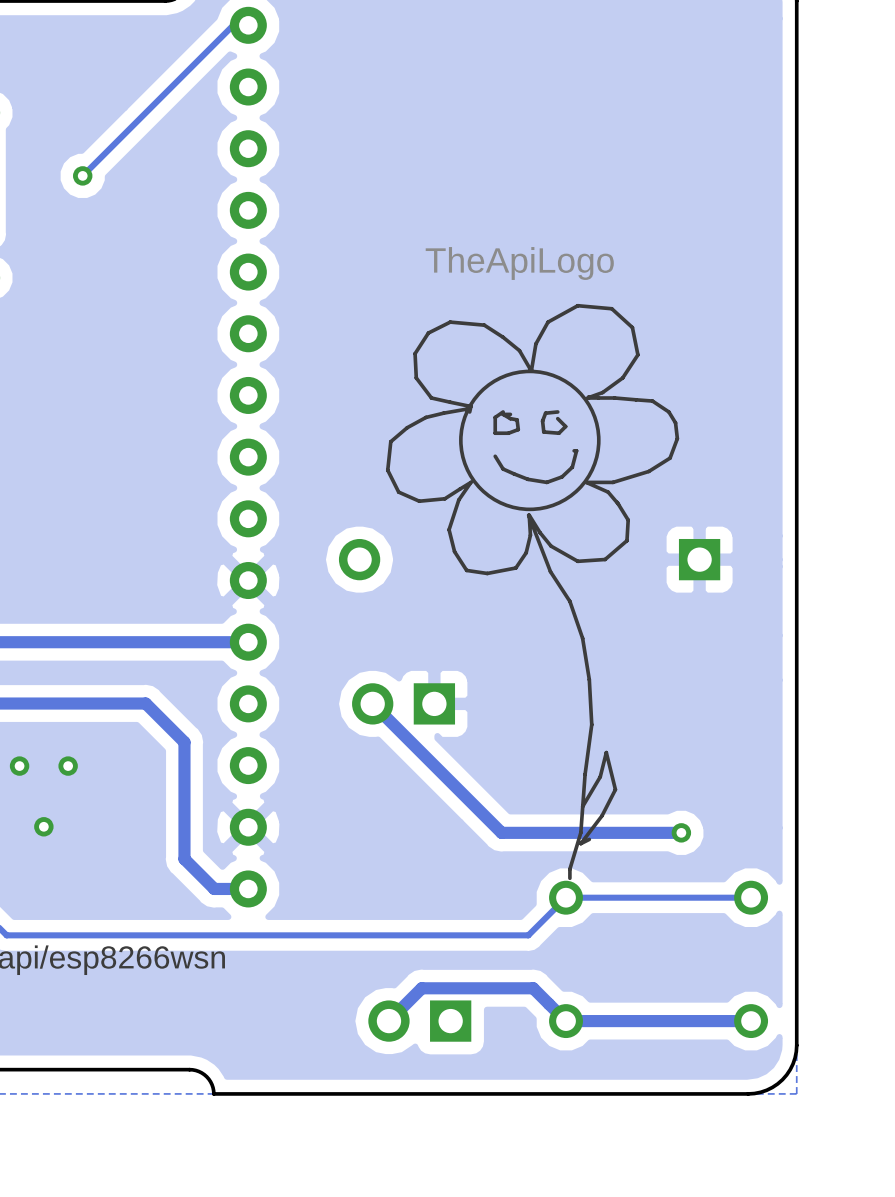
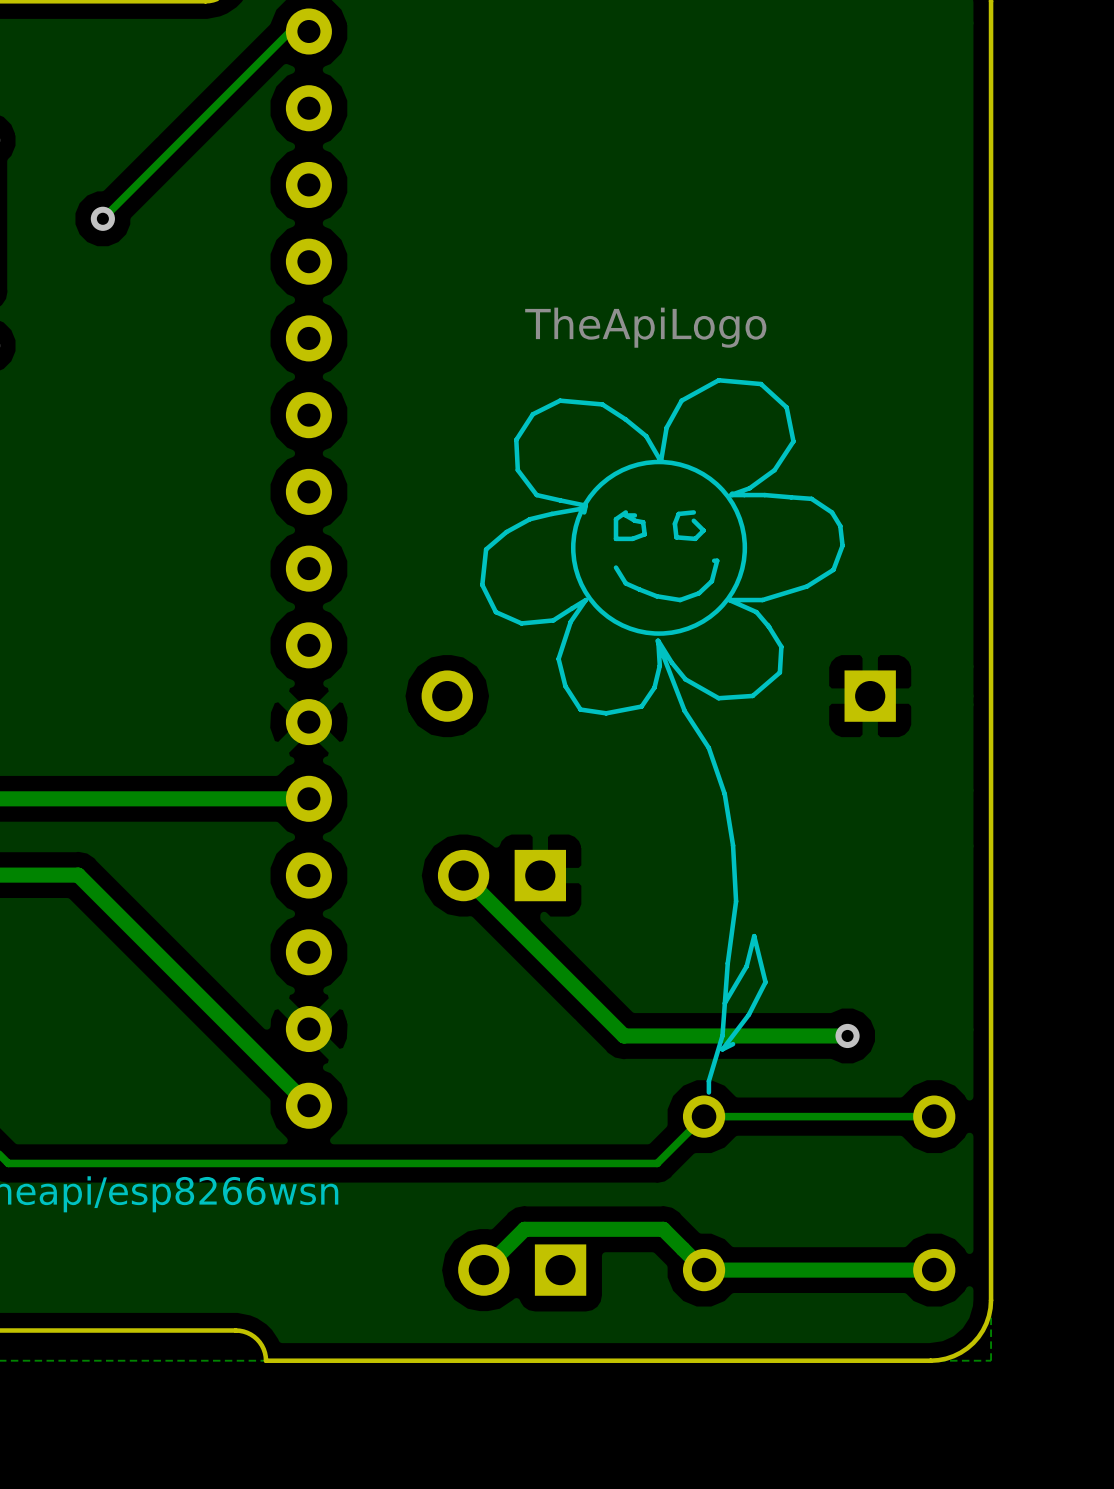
track: (62, 703) (145, 703) (184, 742) (184, 859) (214, 888) (248, 888) -> (78, 875) (308, 1105)
via: (19, 766) -> none
via: (68, 766) -> none
via: (43, 826) -> none

